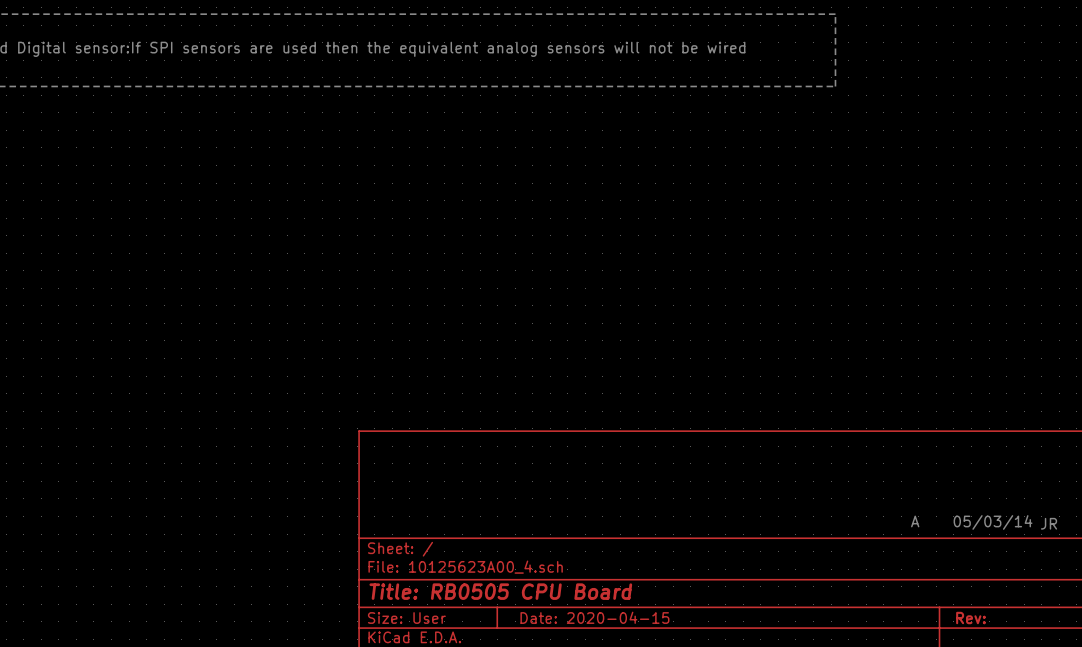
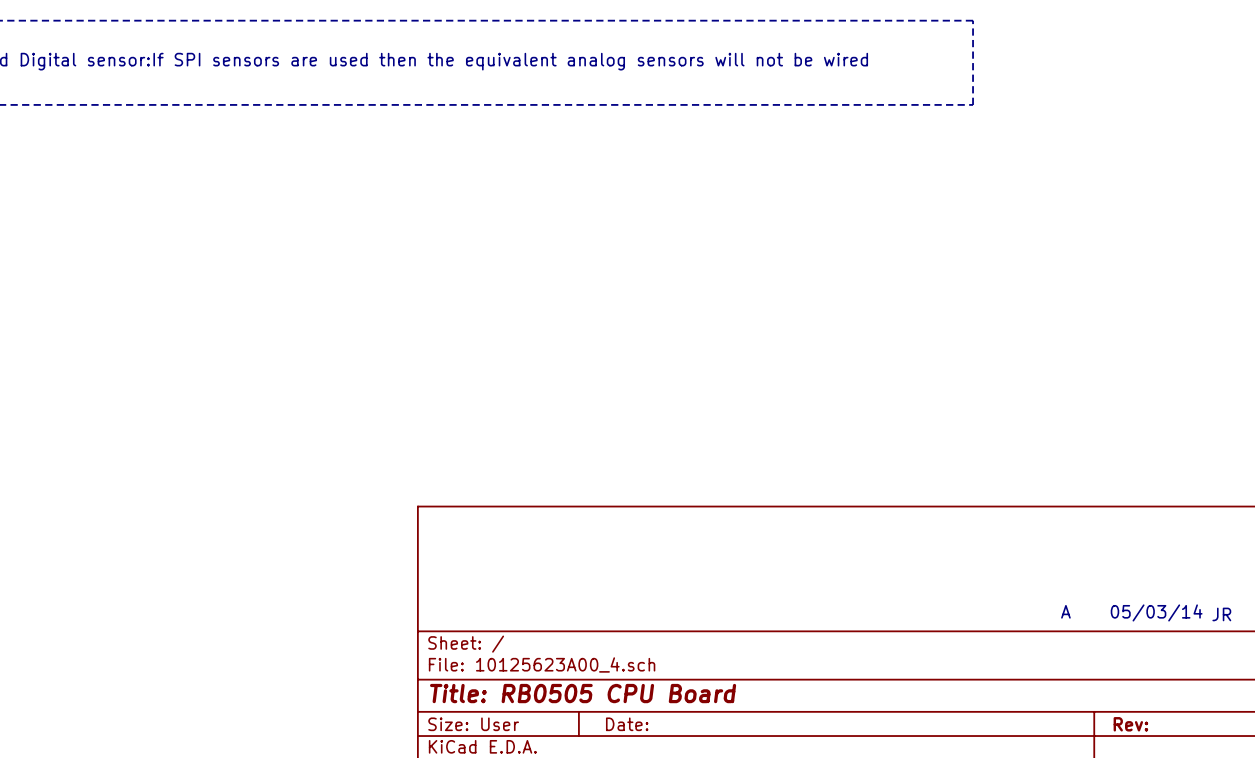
title block: Date: 2020-04-15 (594, 617) -> Date: (627, 724)

